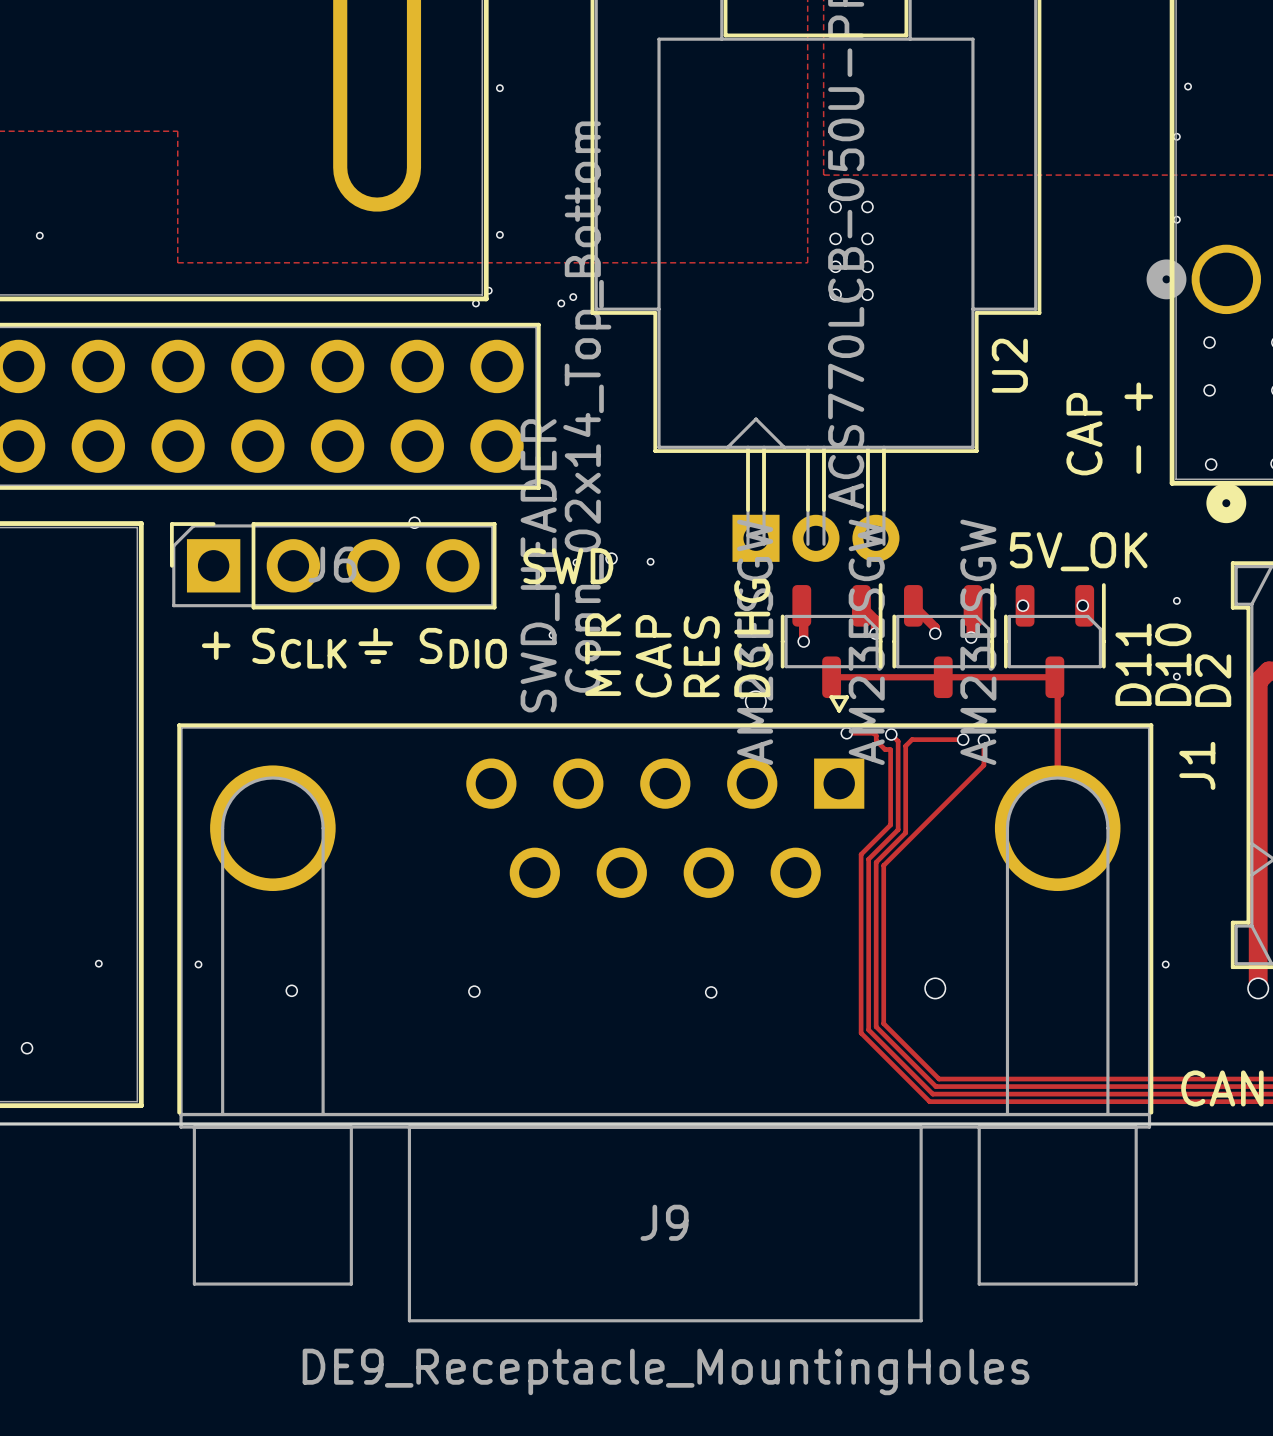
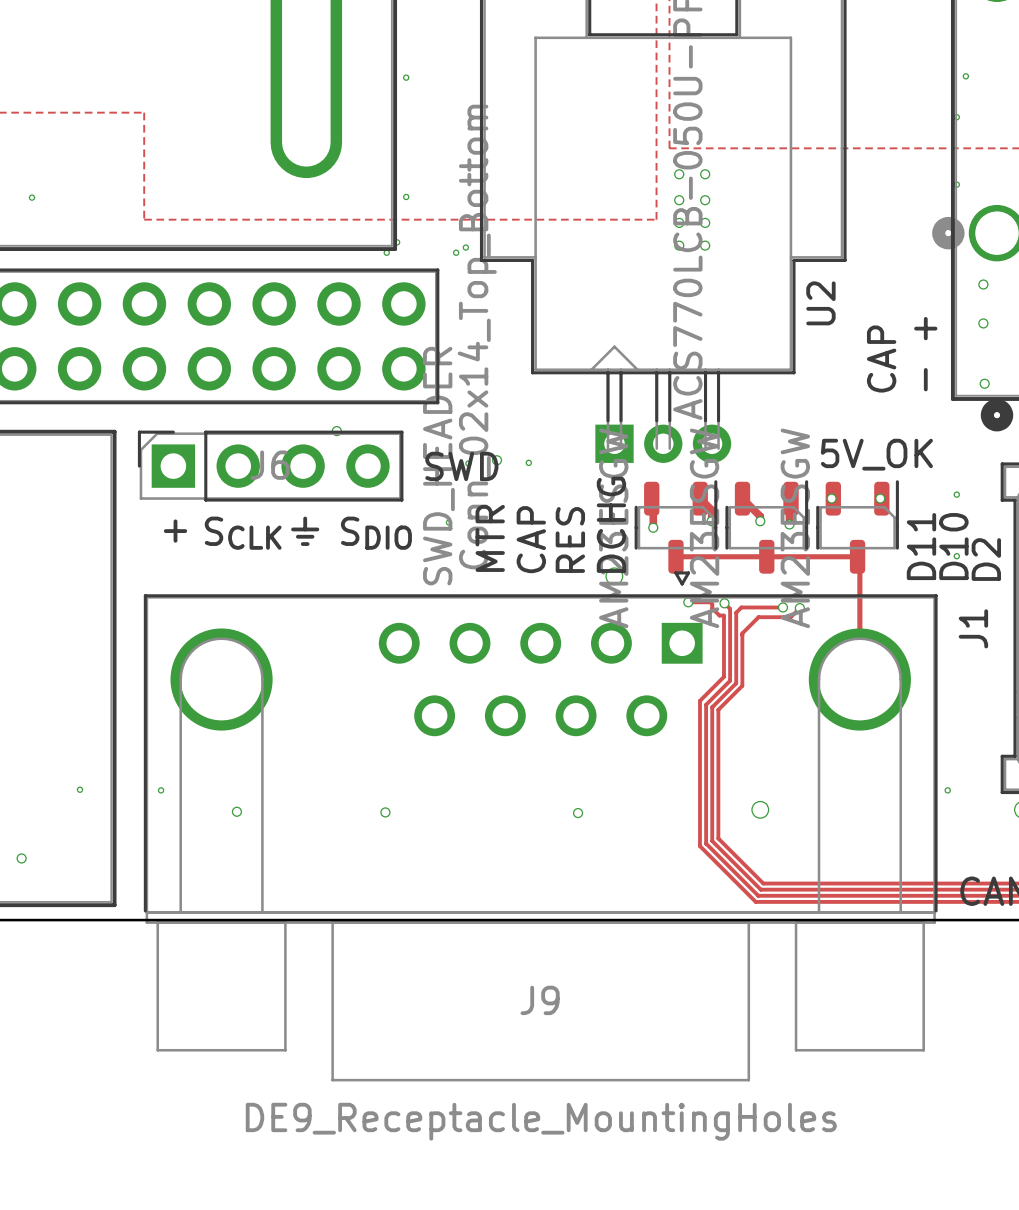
track: (983, 740) (983, 765) (913, 835) -> (799, 608) (790, 617) (758, 617) (742, 633) (742, 685)

